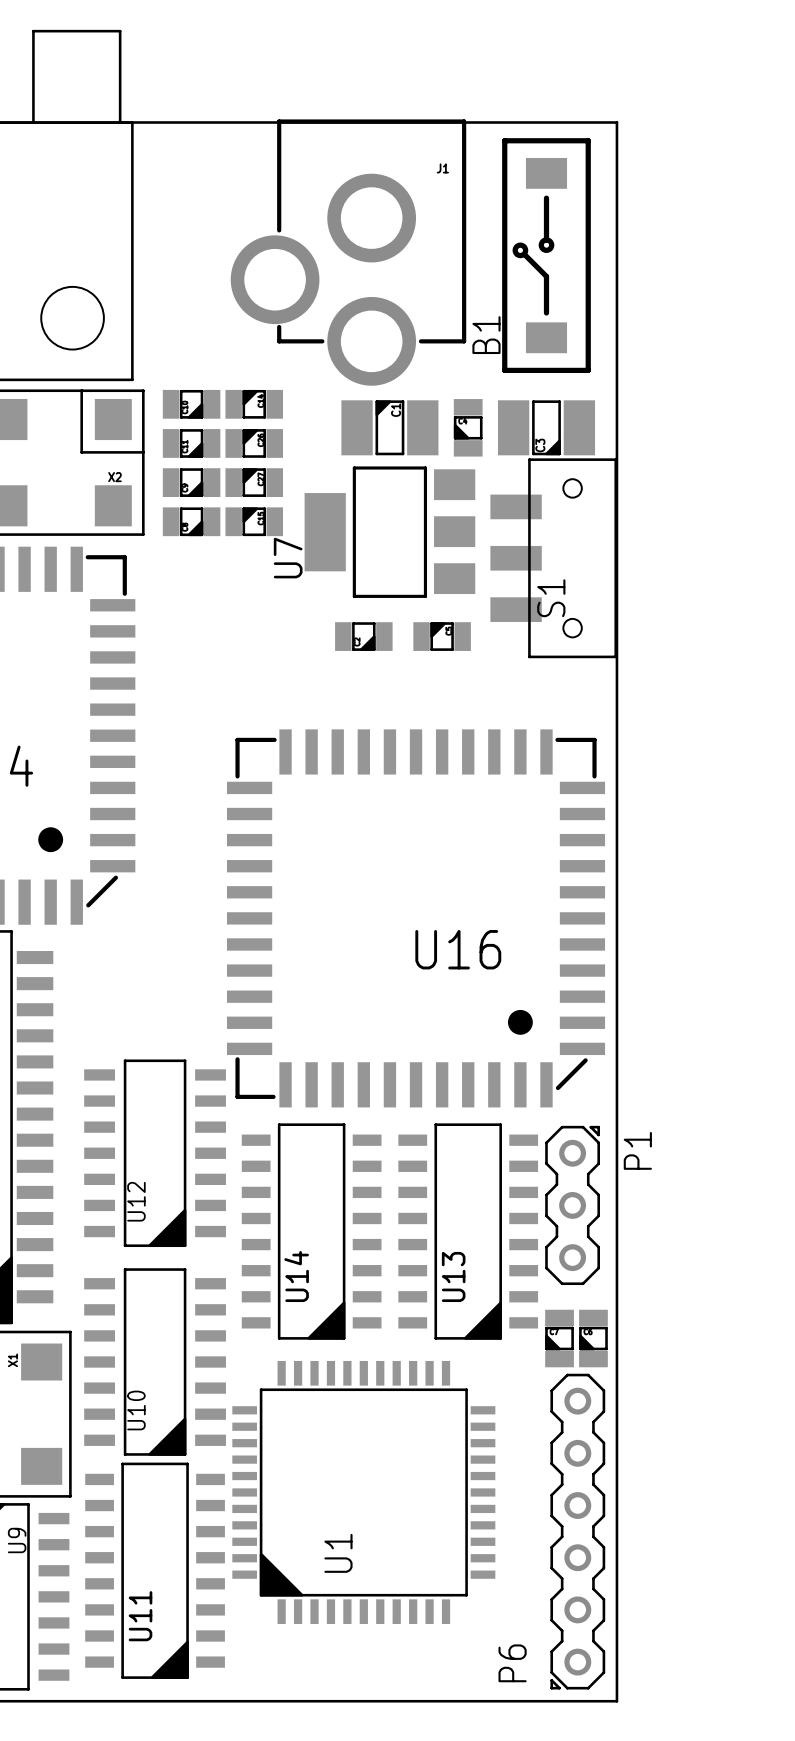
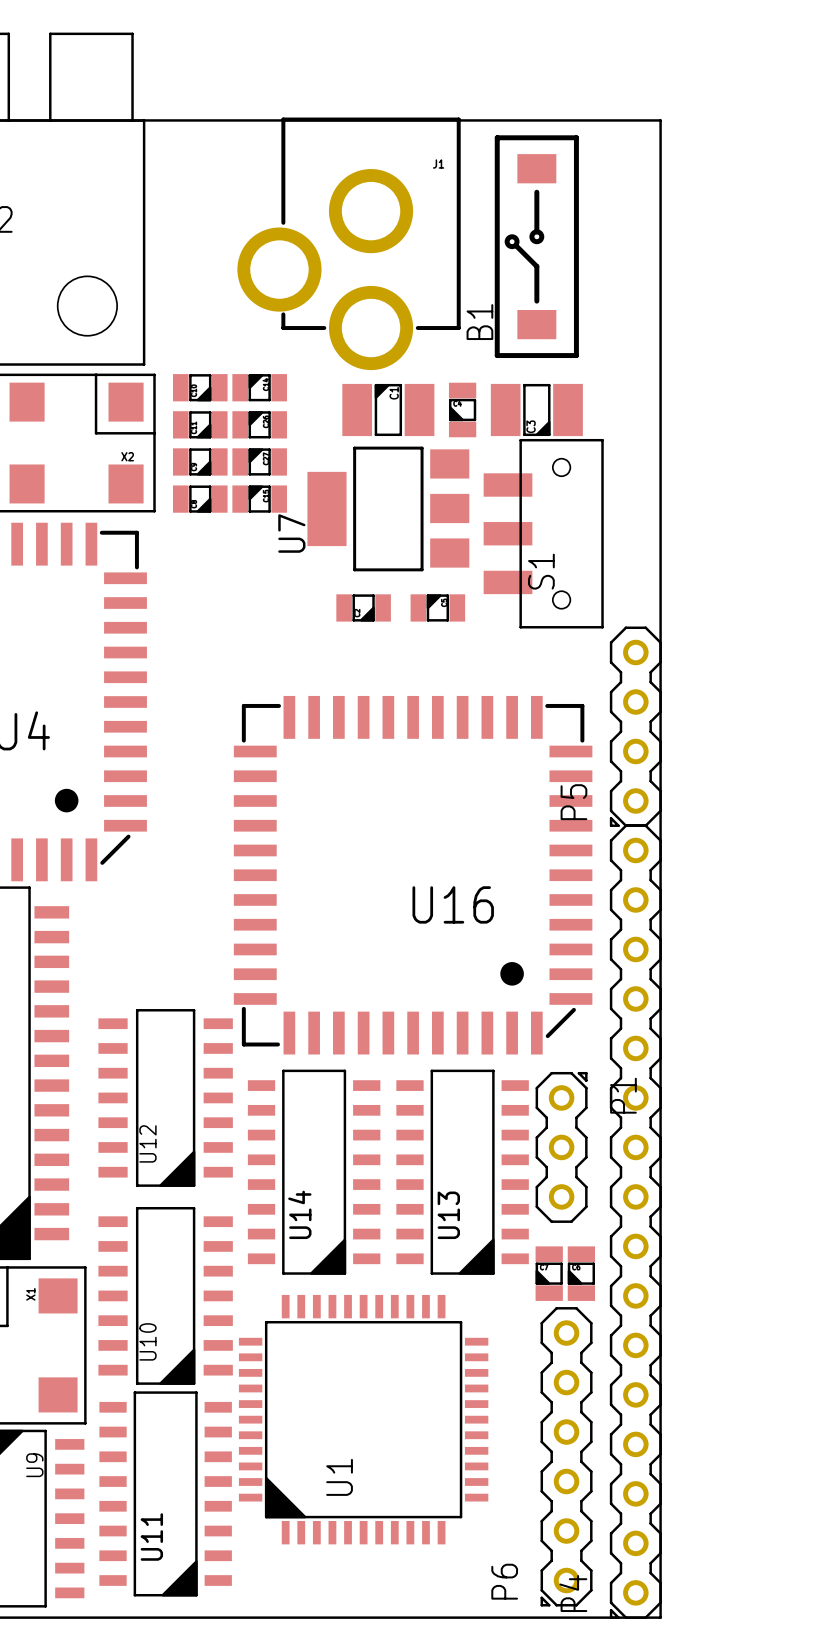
board edge: (616, 122) (616, 1701) -> (603, 120) (660, 120) (660, 1617) (603, 1617)
P5: none -> (635, 726)
P4: none -> (635, 1221)

